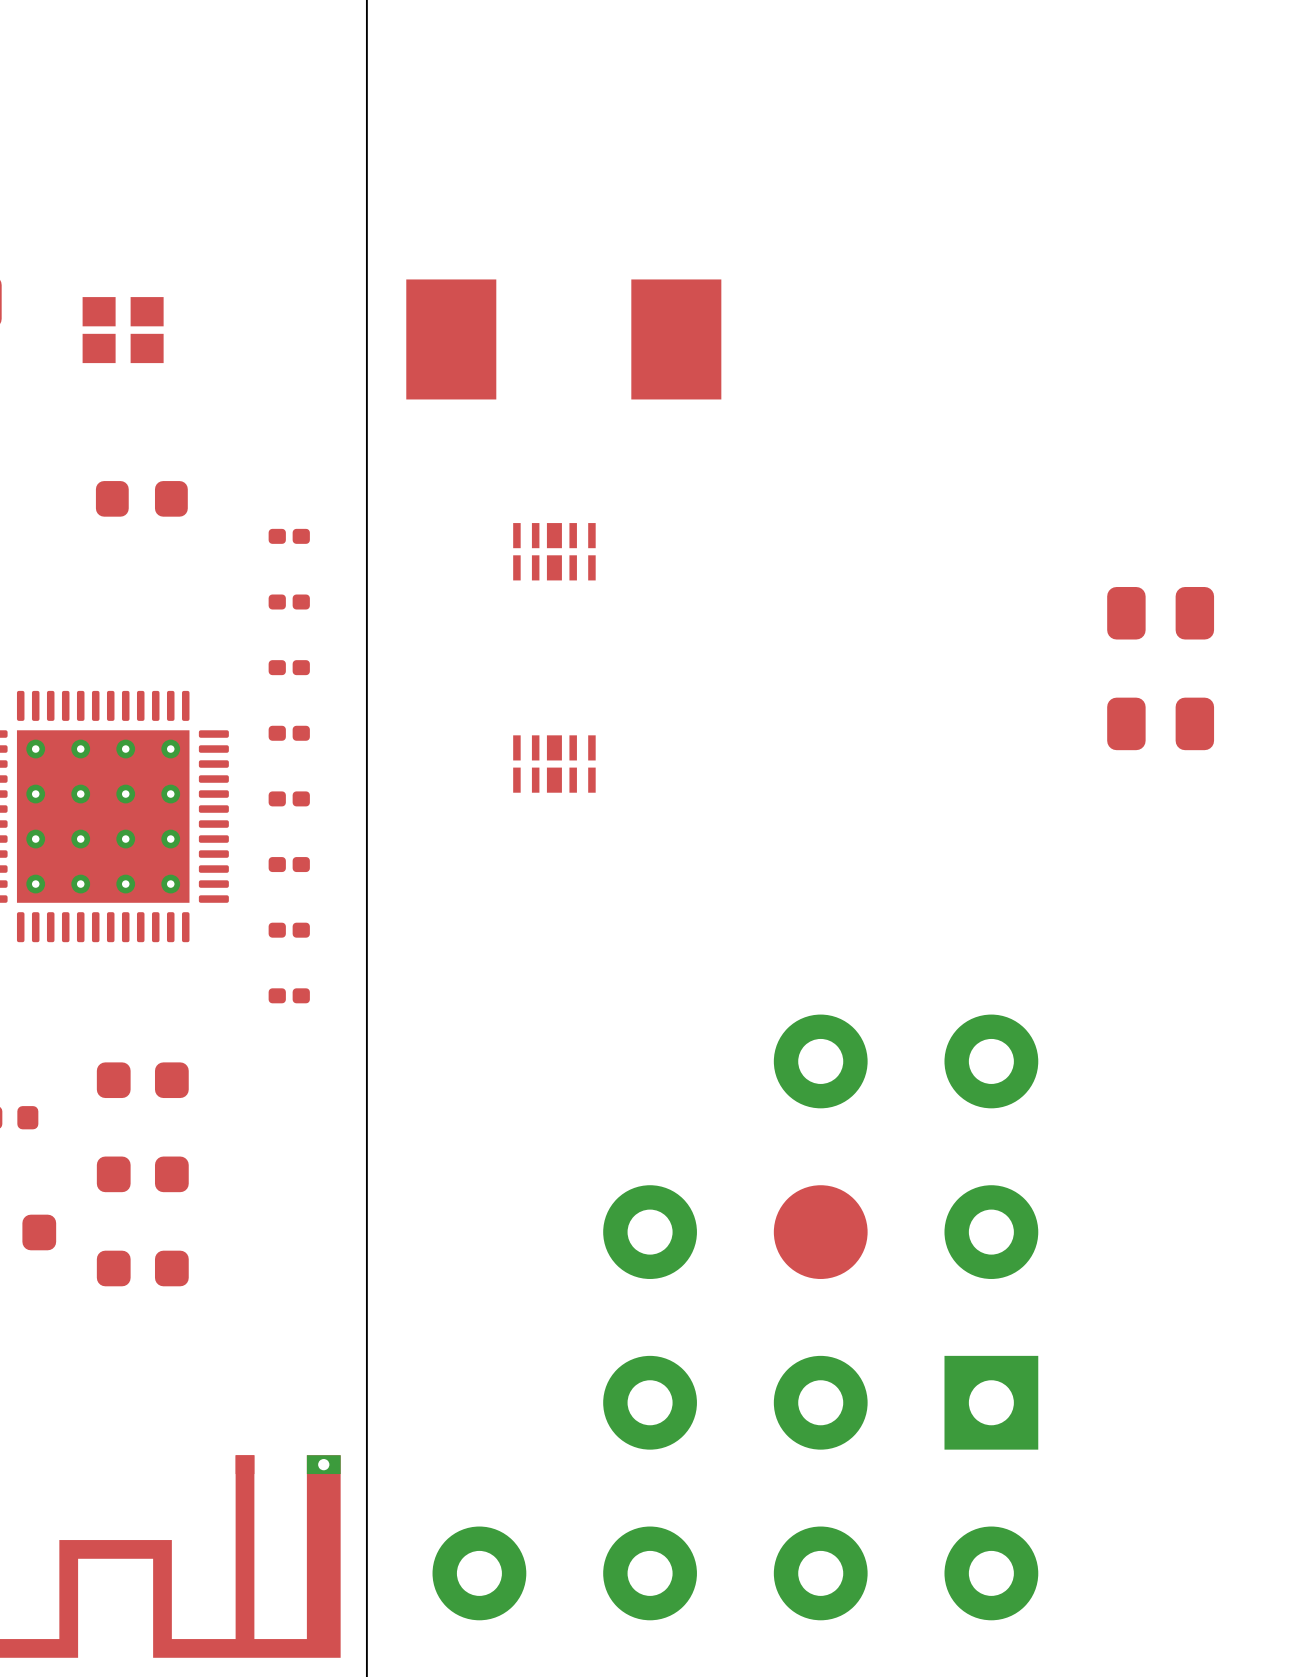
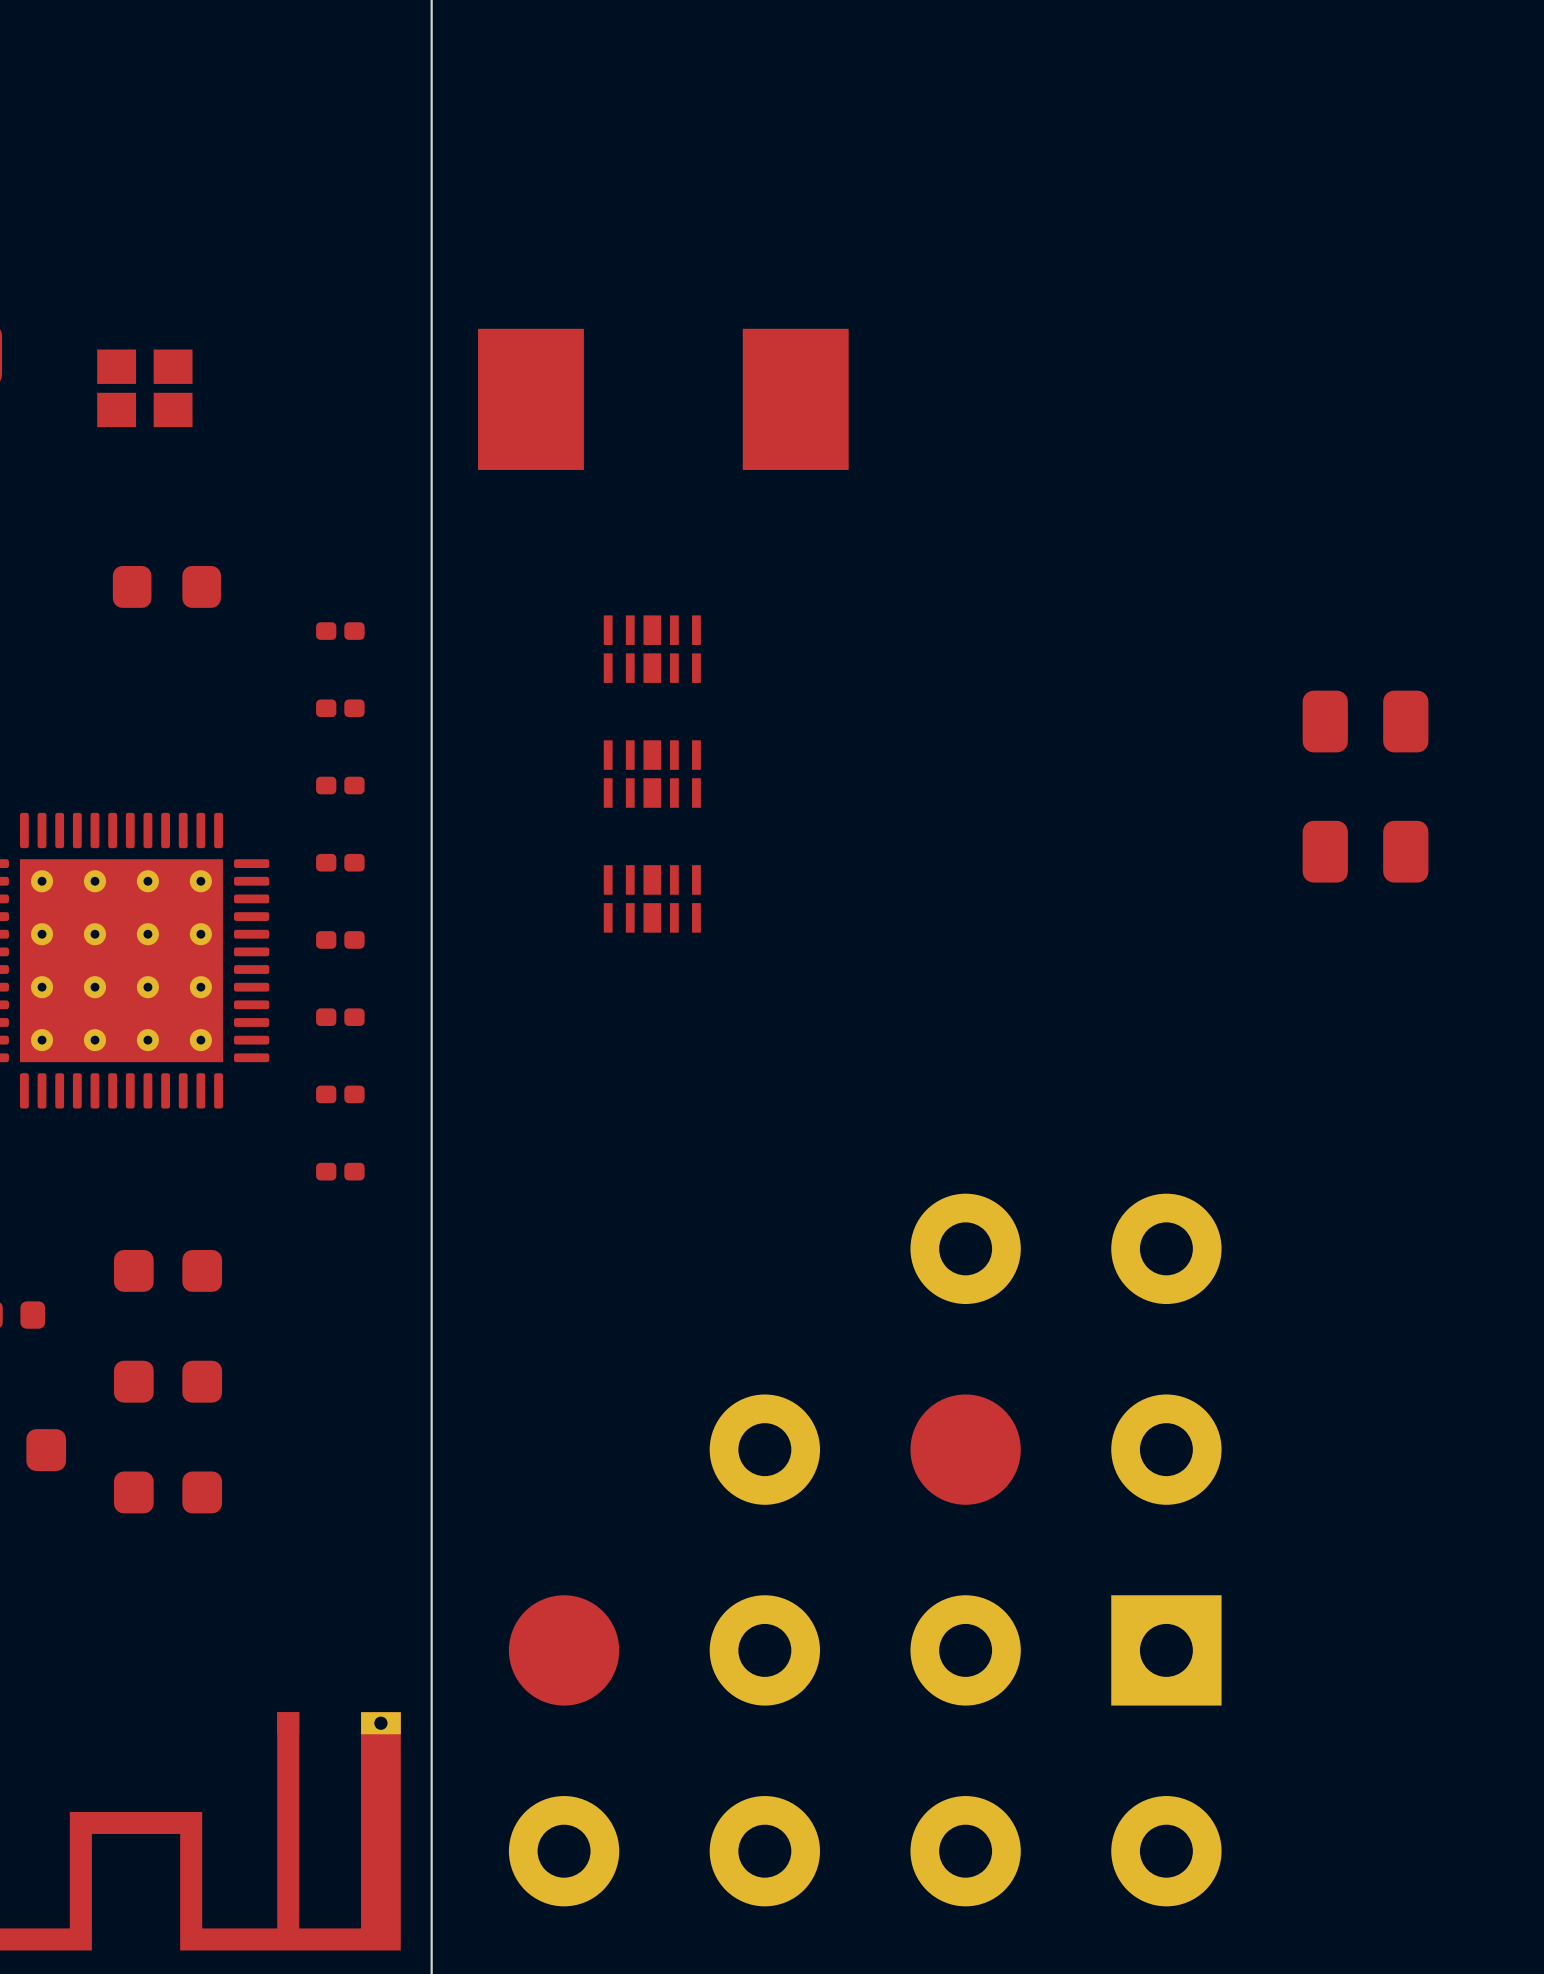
part: none -> (652, 774)
part: none -> (564, 1650)

